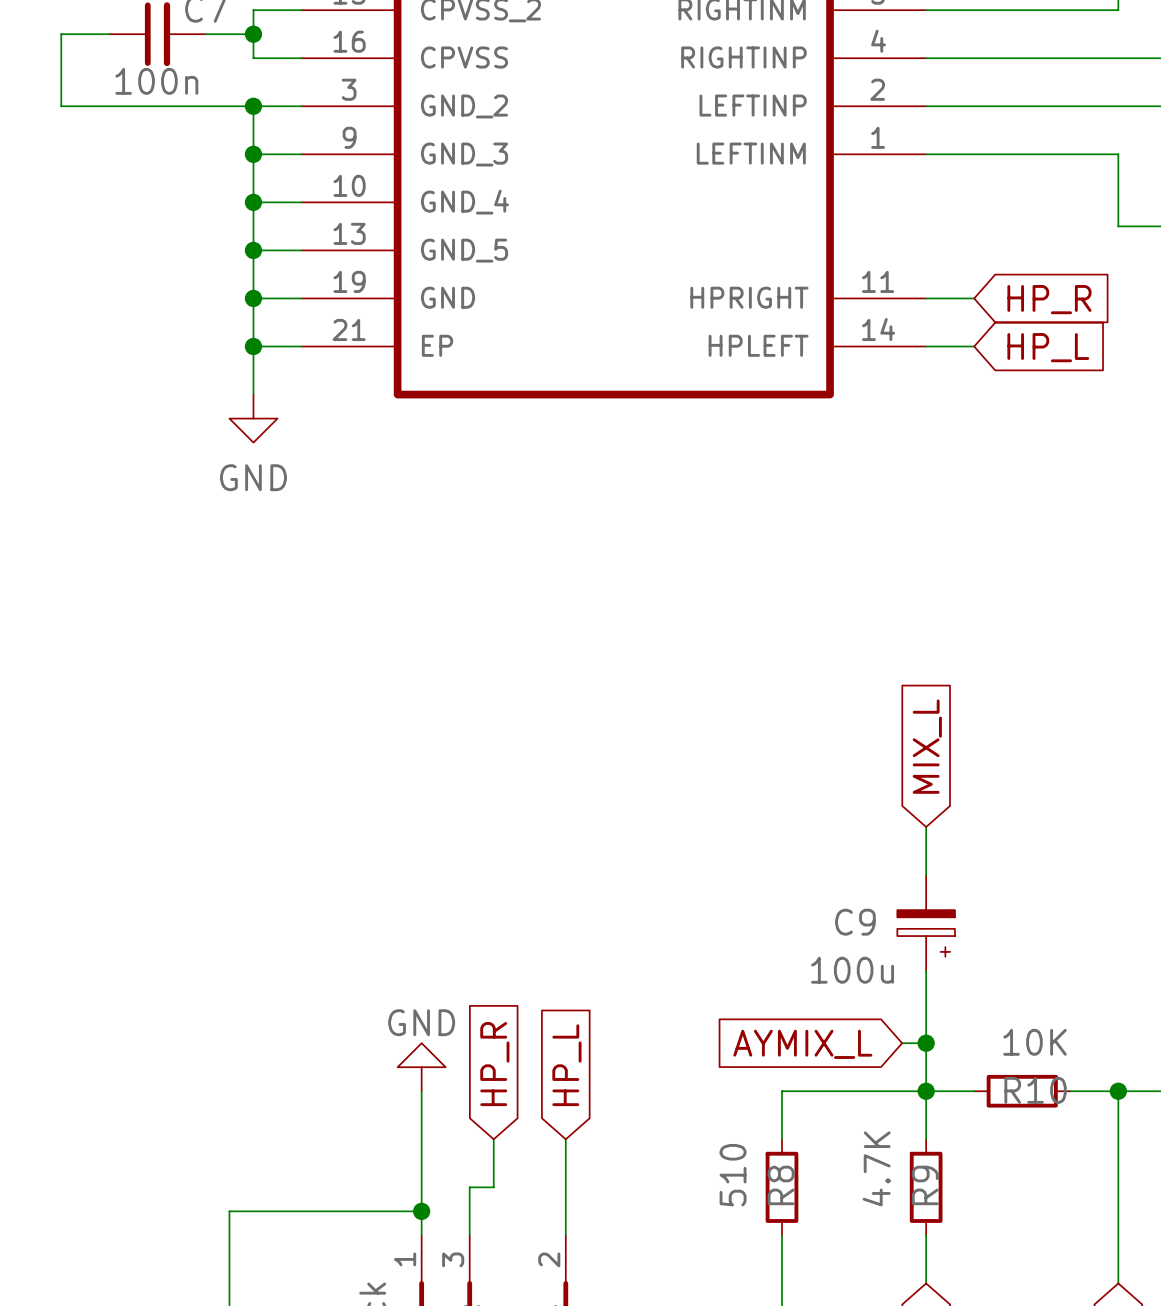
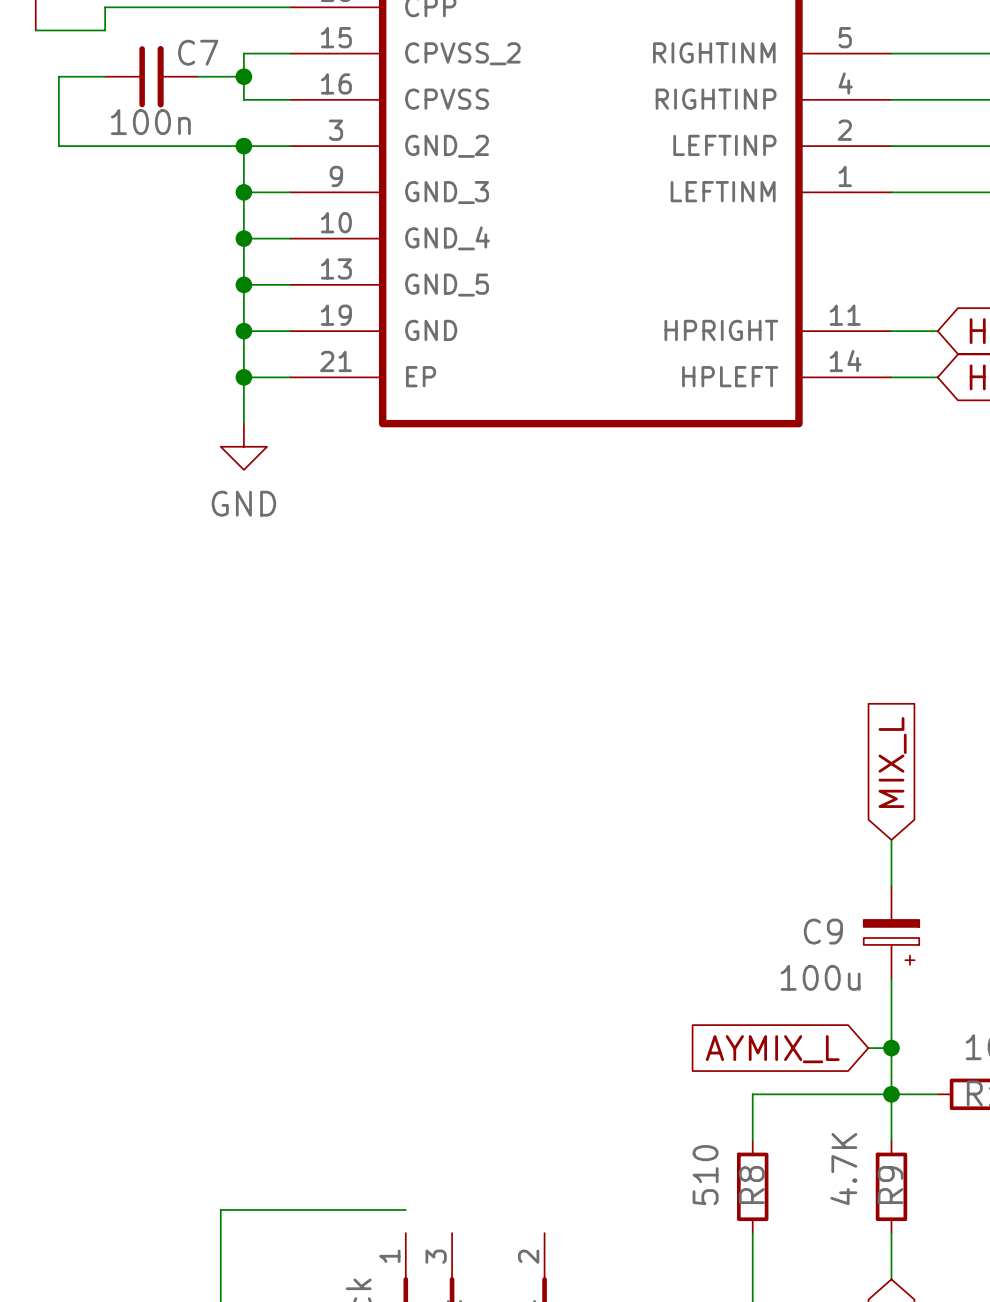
global label: HP_R (494, 1064) -> none
global label: HP_L (566, 1065) -> none
power symbol: GND (421, 1067) -> none
wire: (421, 1091) (421, 1235) -> none
wire: (493, 1139) (493, 1187) (469, 1187) (469, 1235) -> none
wire: (565, 1139) (565, 1235) -> none
junction: (421, 1211) -> none

